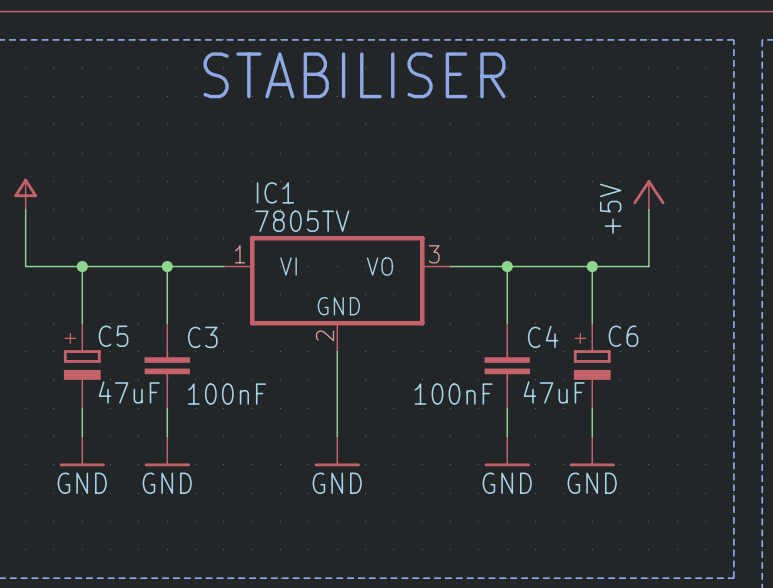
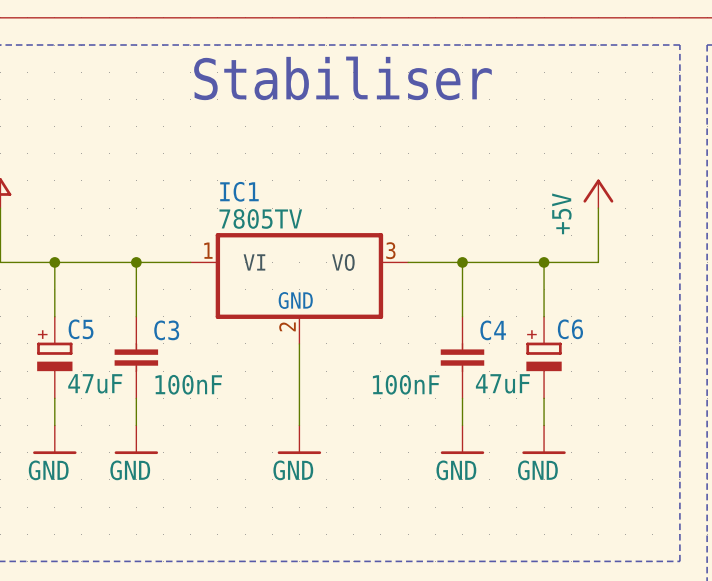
text: STABILISER (354, 75) -> none
text: none -> Stabiliser (342, 78)

